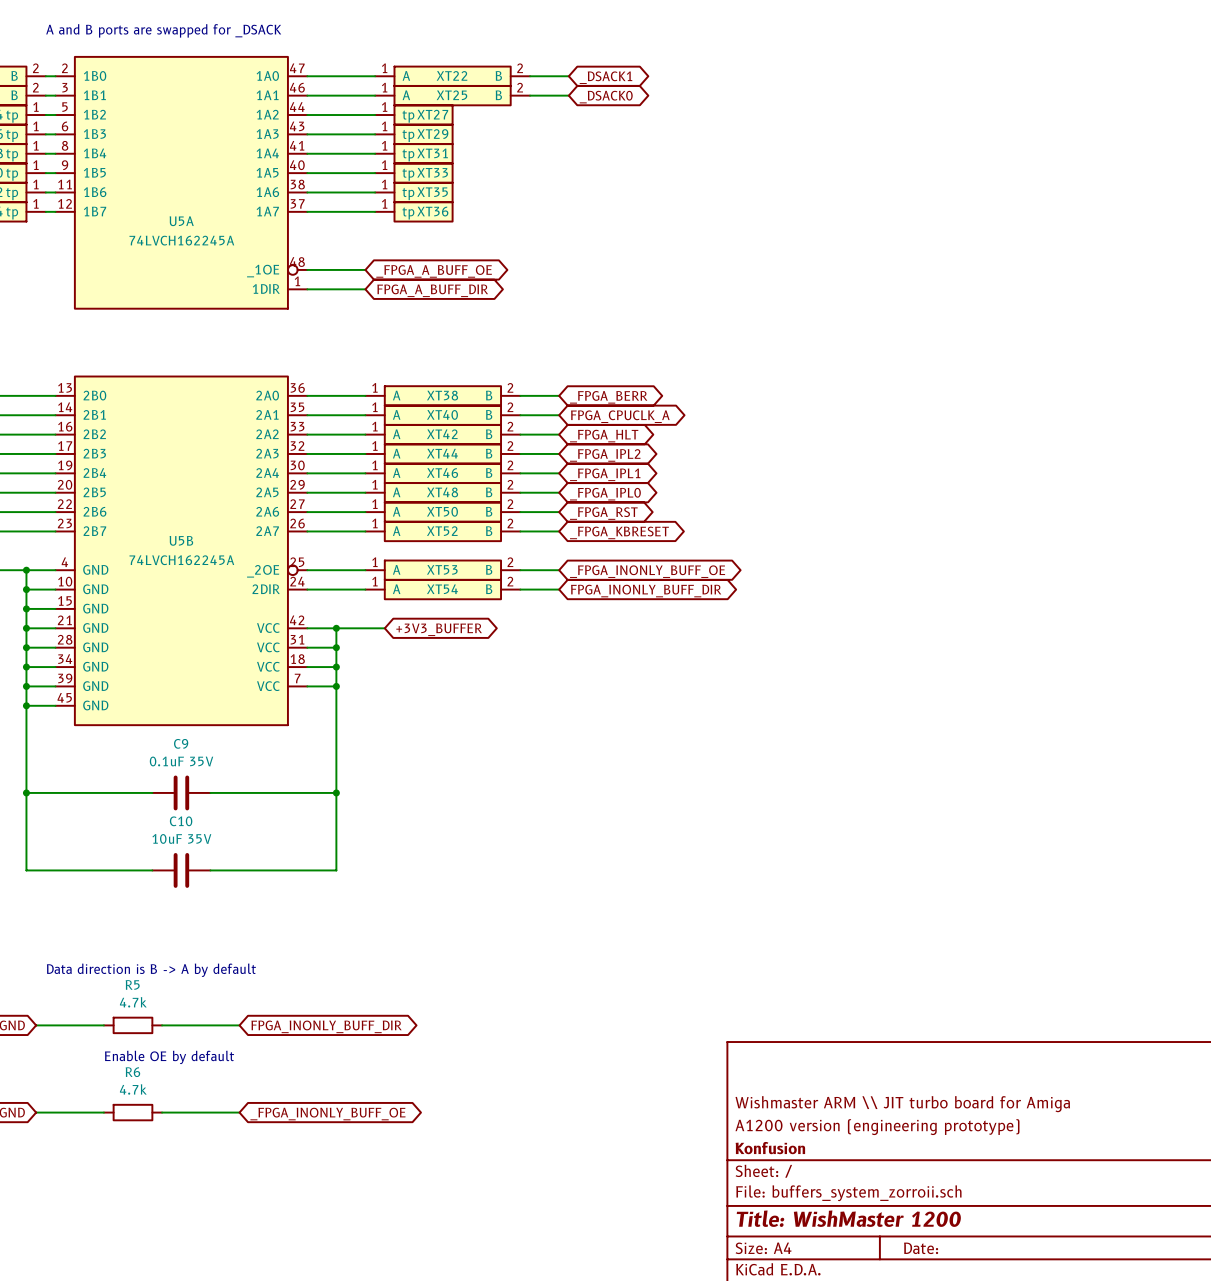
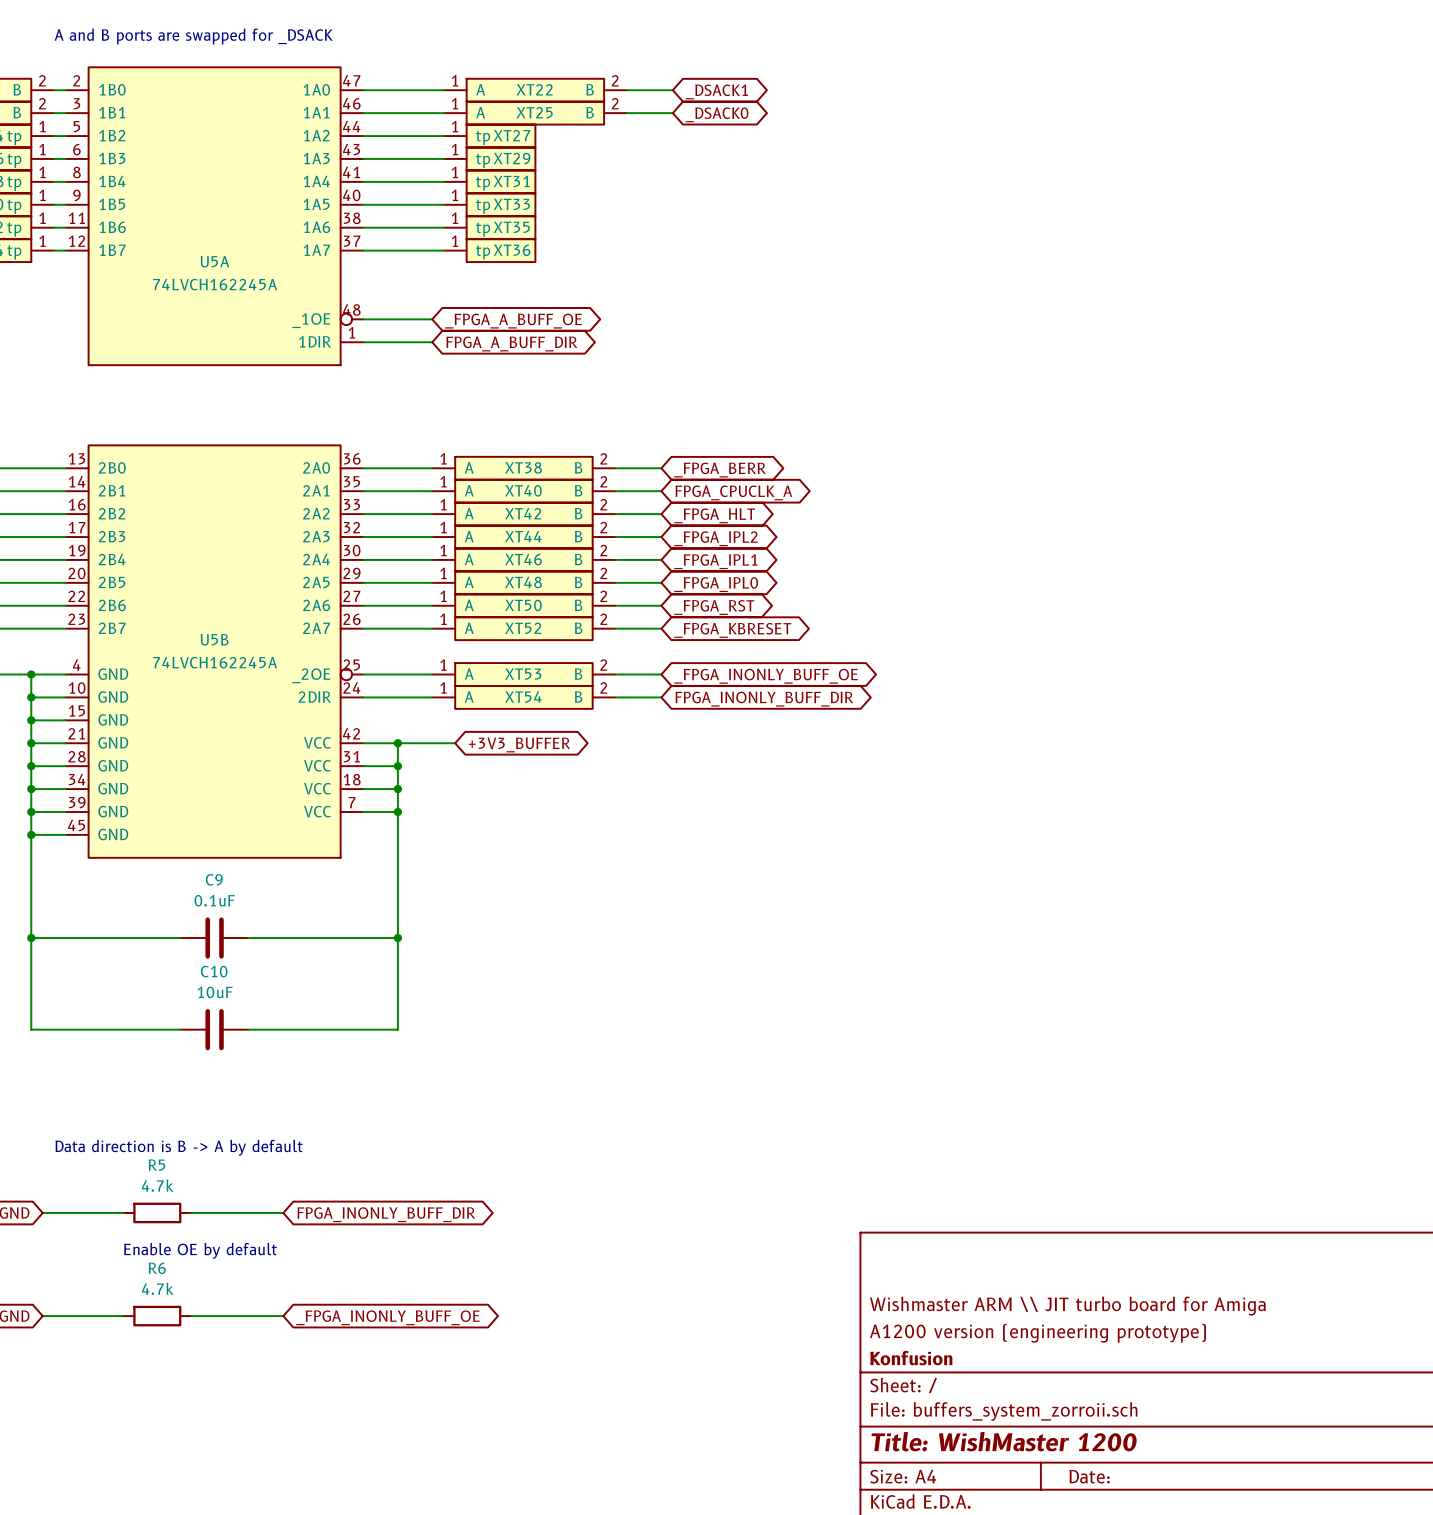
C9 value: 0.1uF 35V (181, 761) -> 0.1uF (214, 900)
C10 value: 10uF 35V (181, 838) -> 10uF (215, 992)

